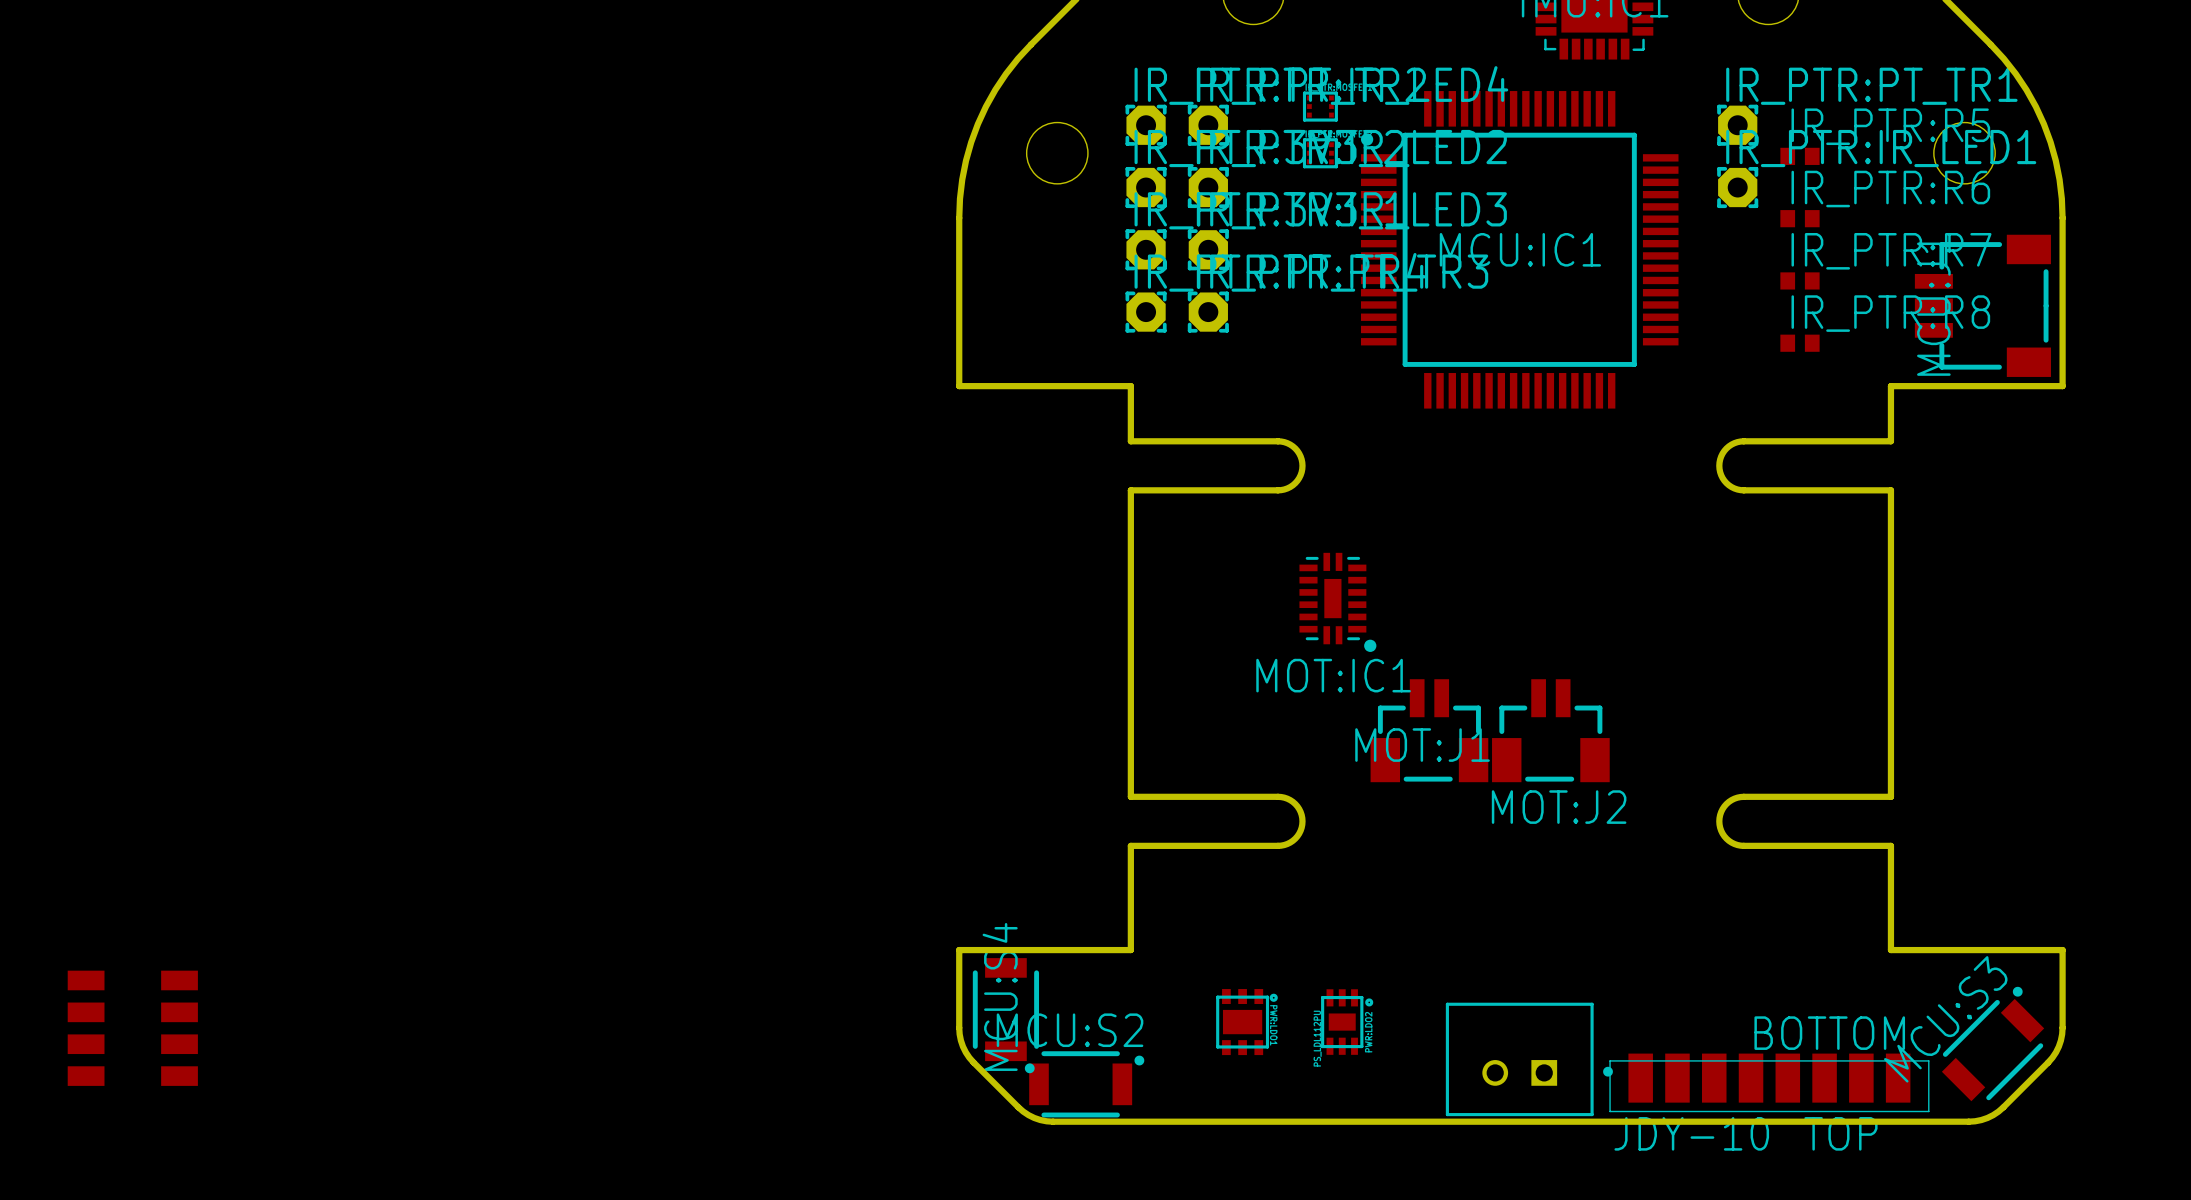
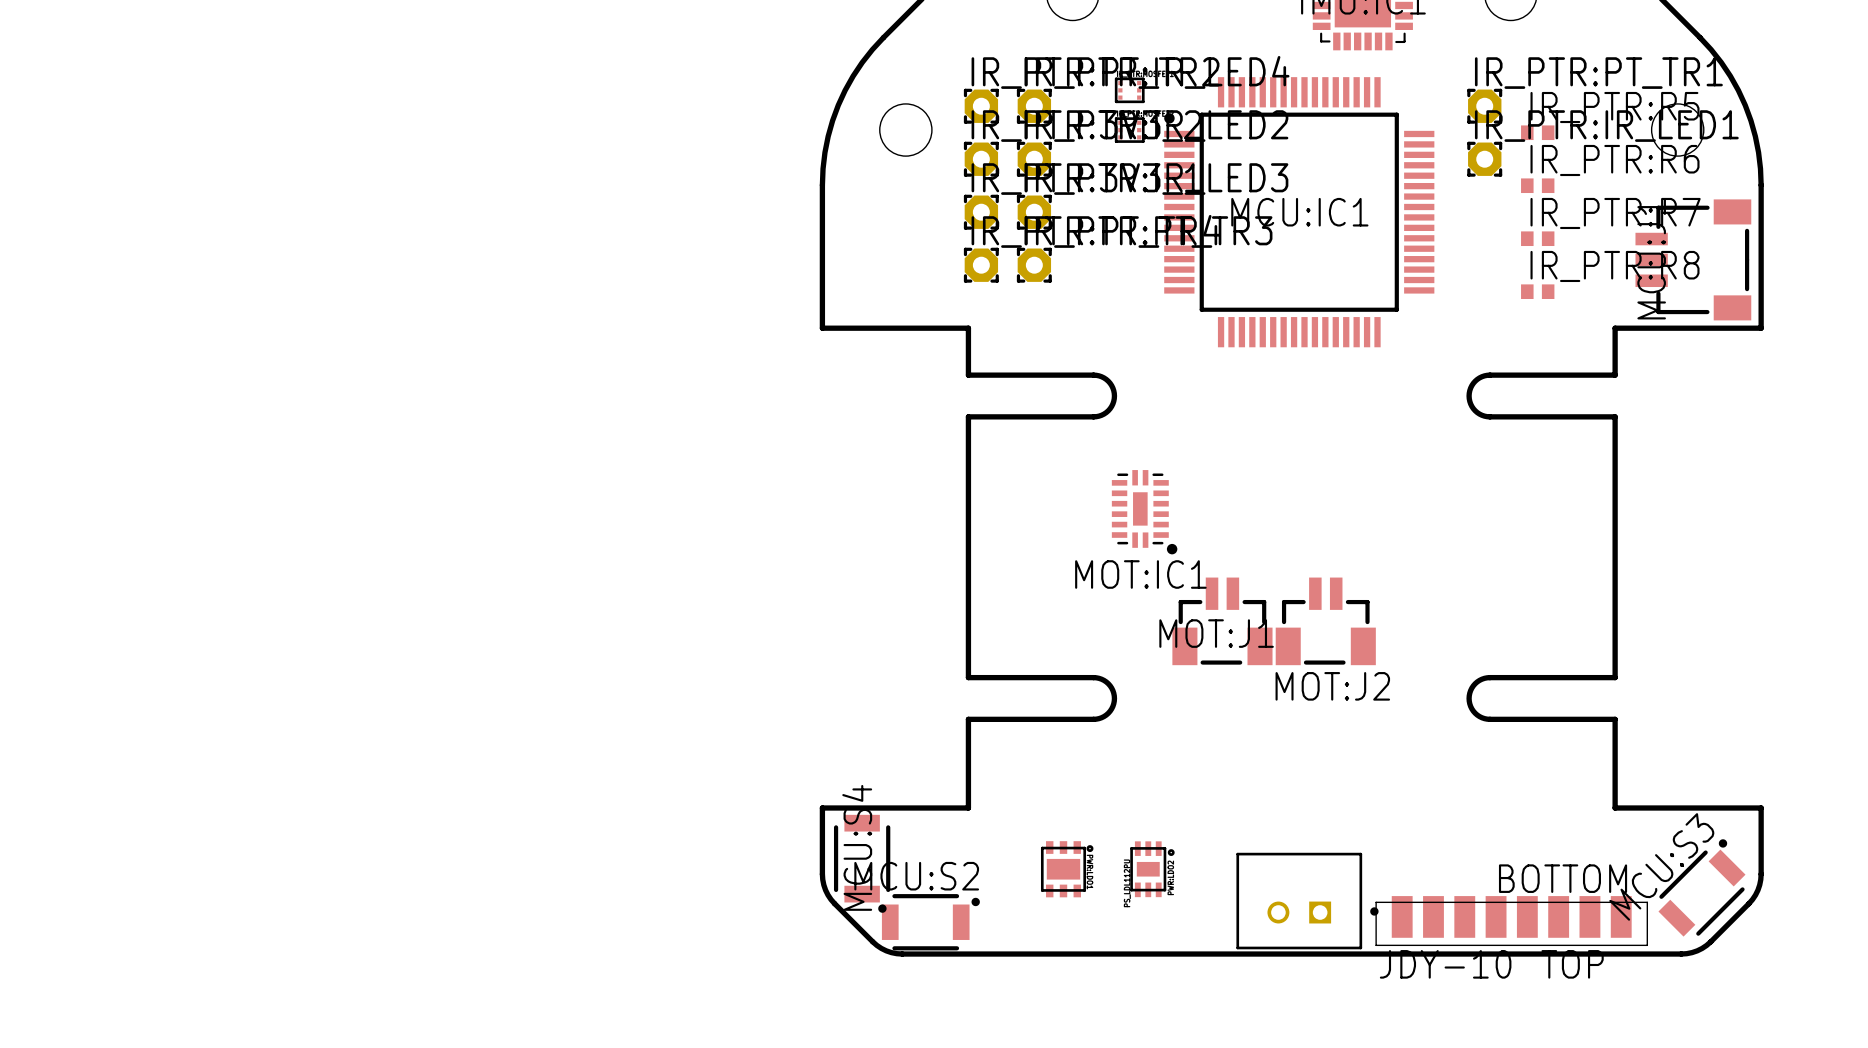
part: (86, 1028) -> none
part: (179, 1028) -> none

